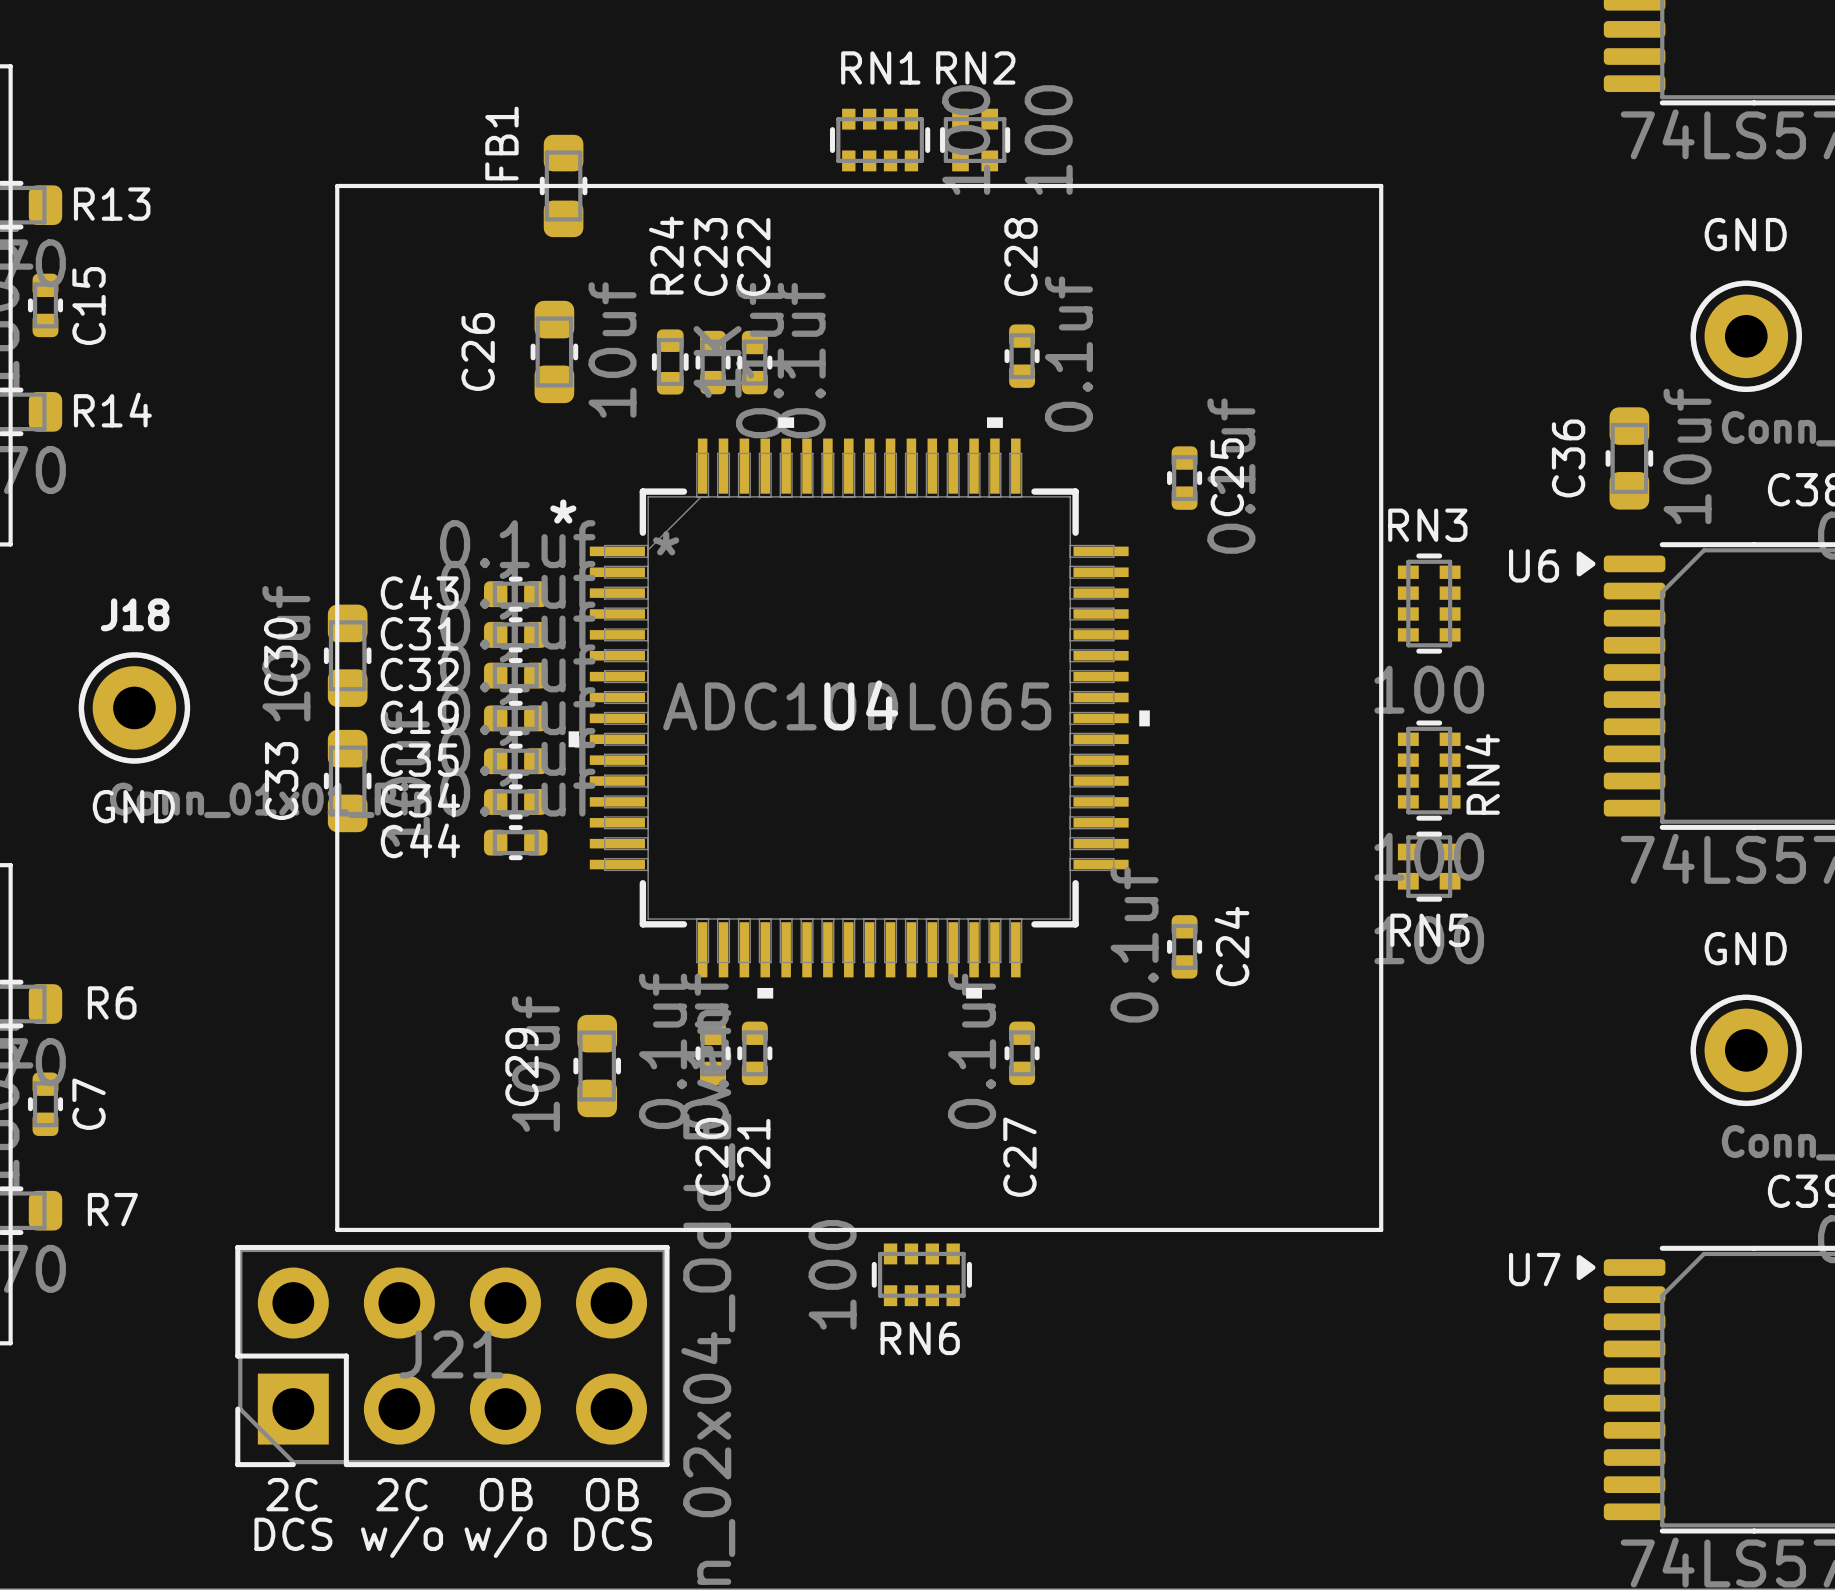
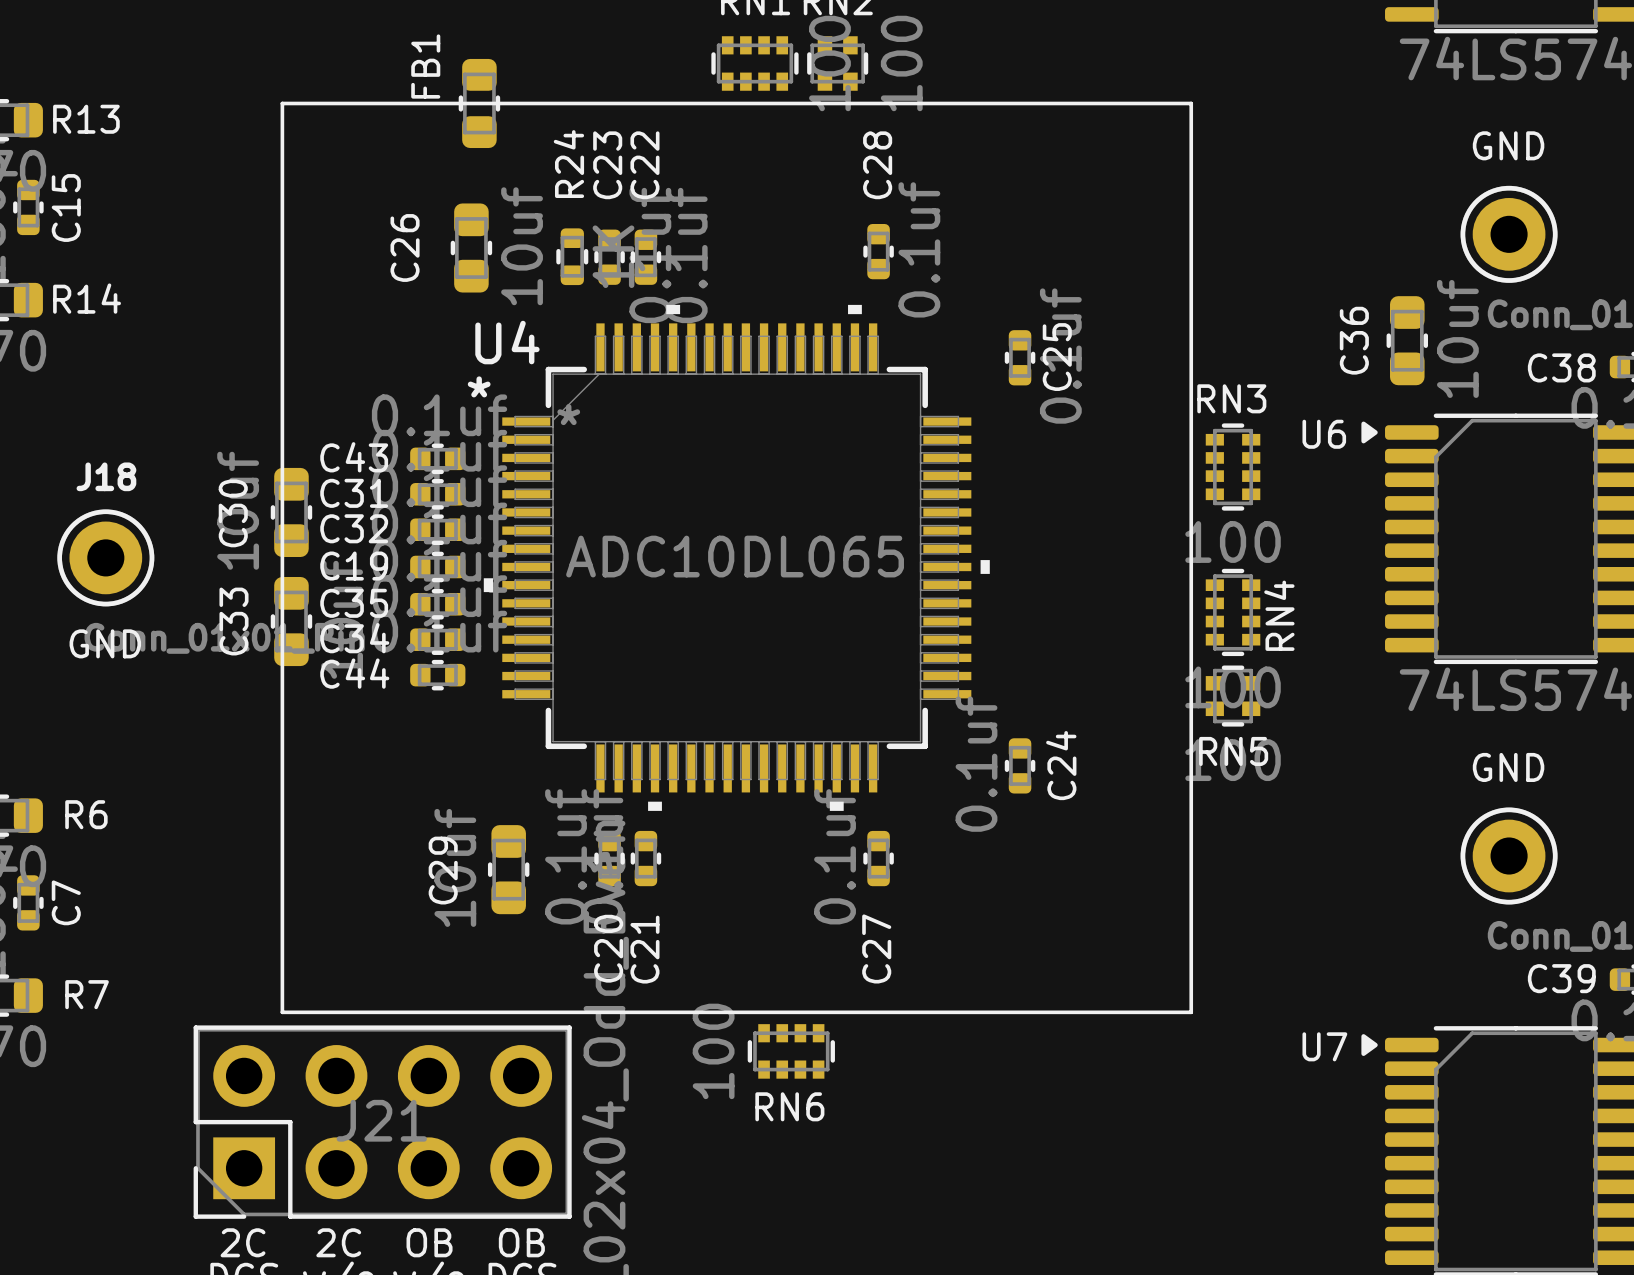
U4 name position: U4 (861, 705) -> U4 (507, 342)

